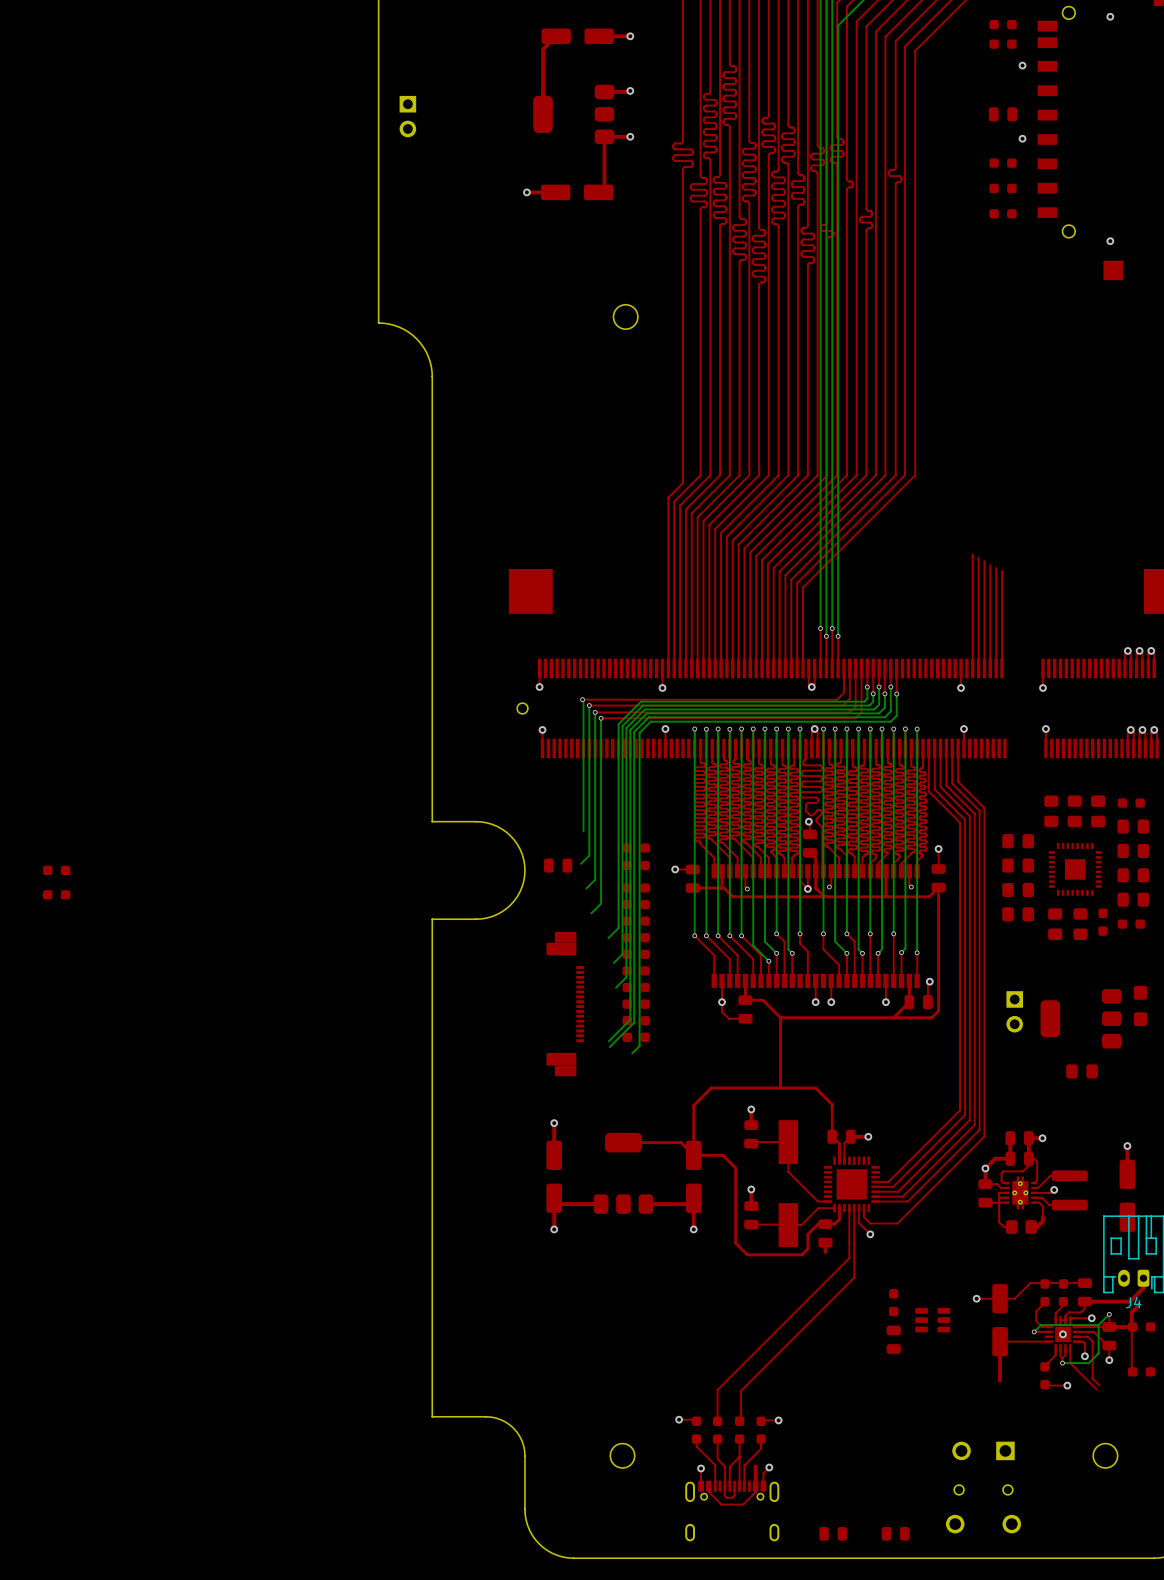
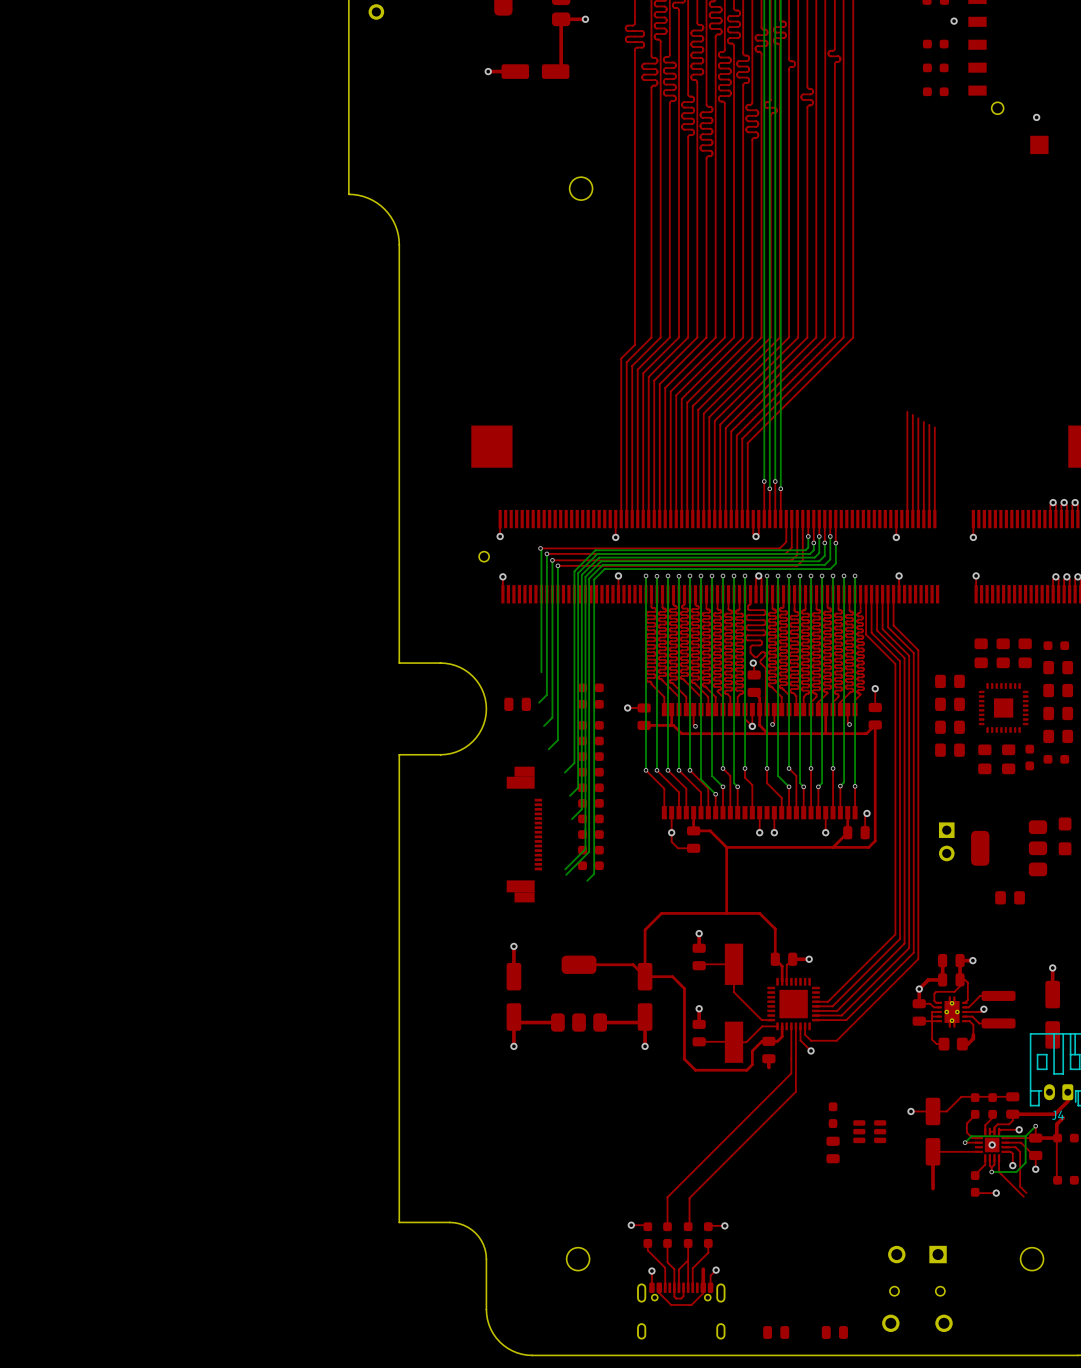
part: (56, 870) -> none
part: (56, 894) -> none

